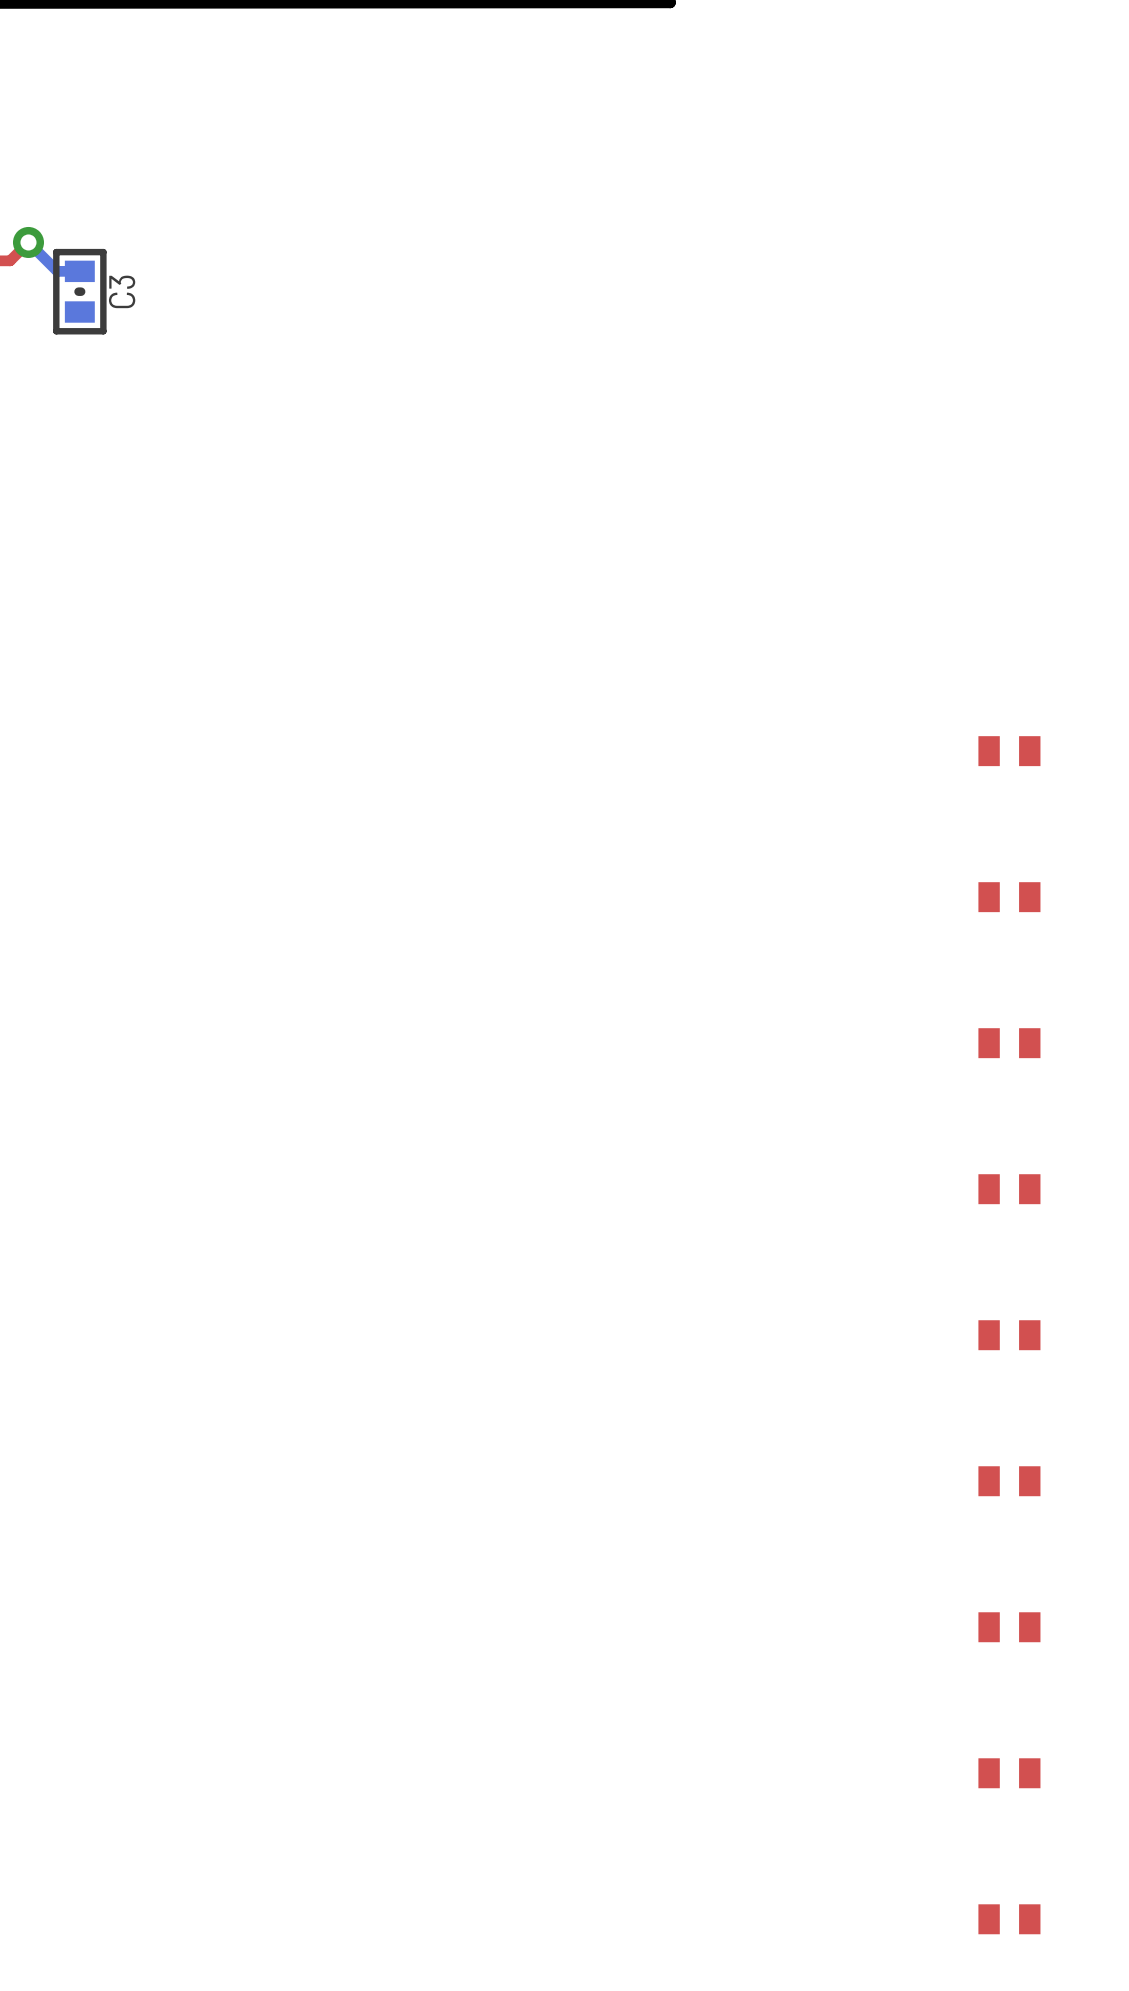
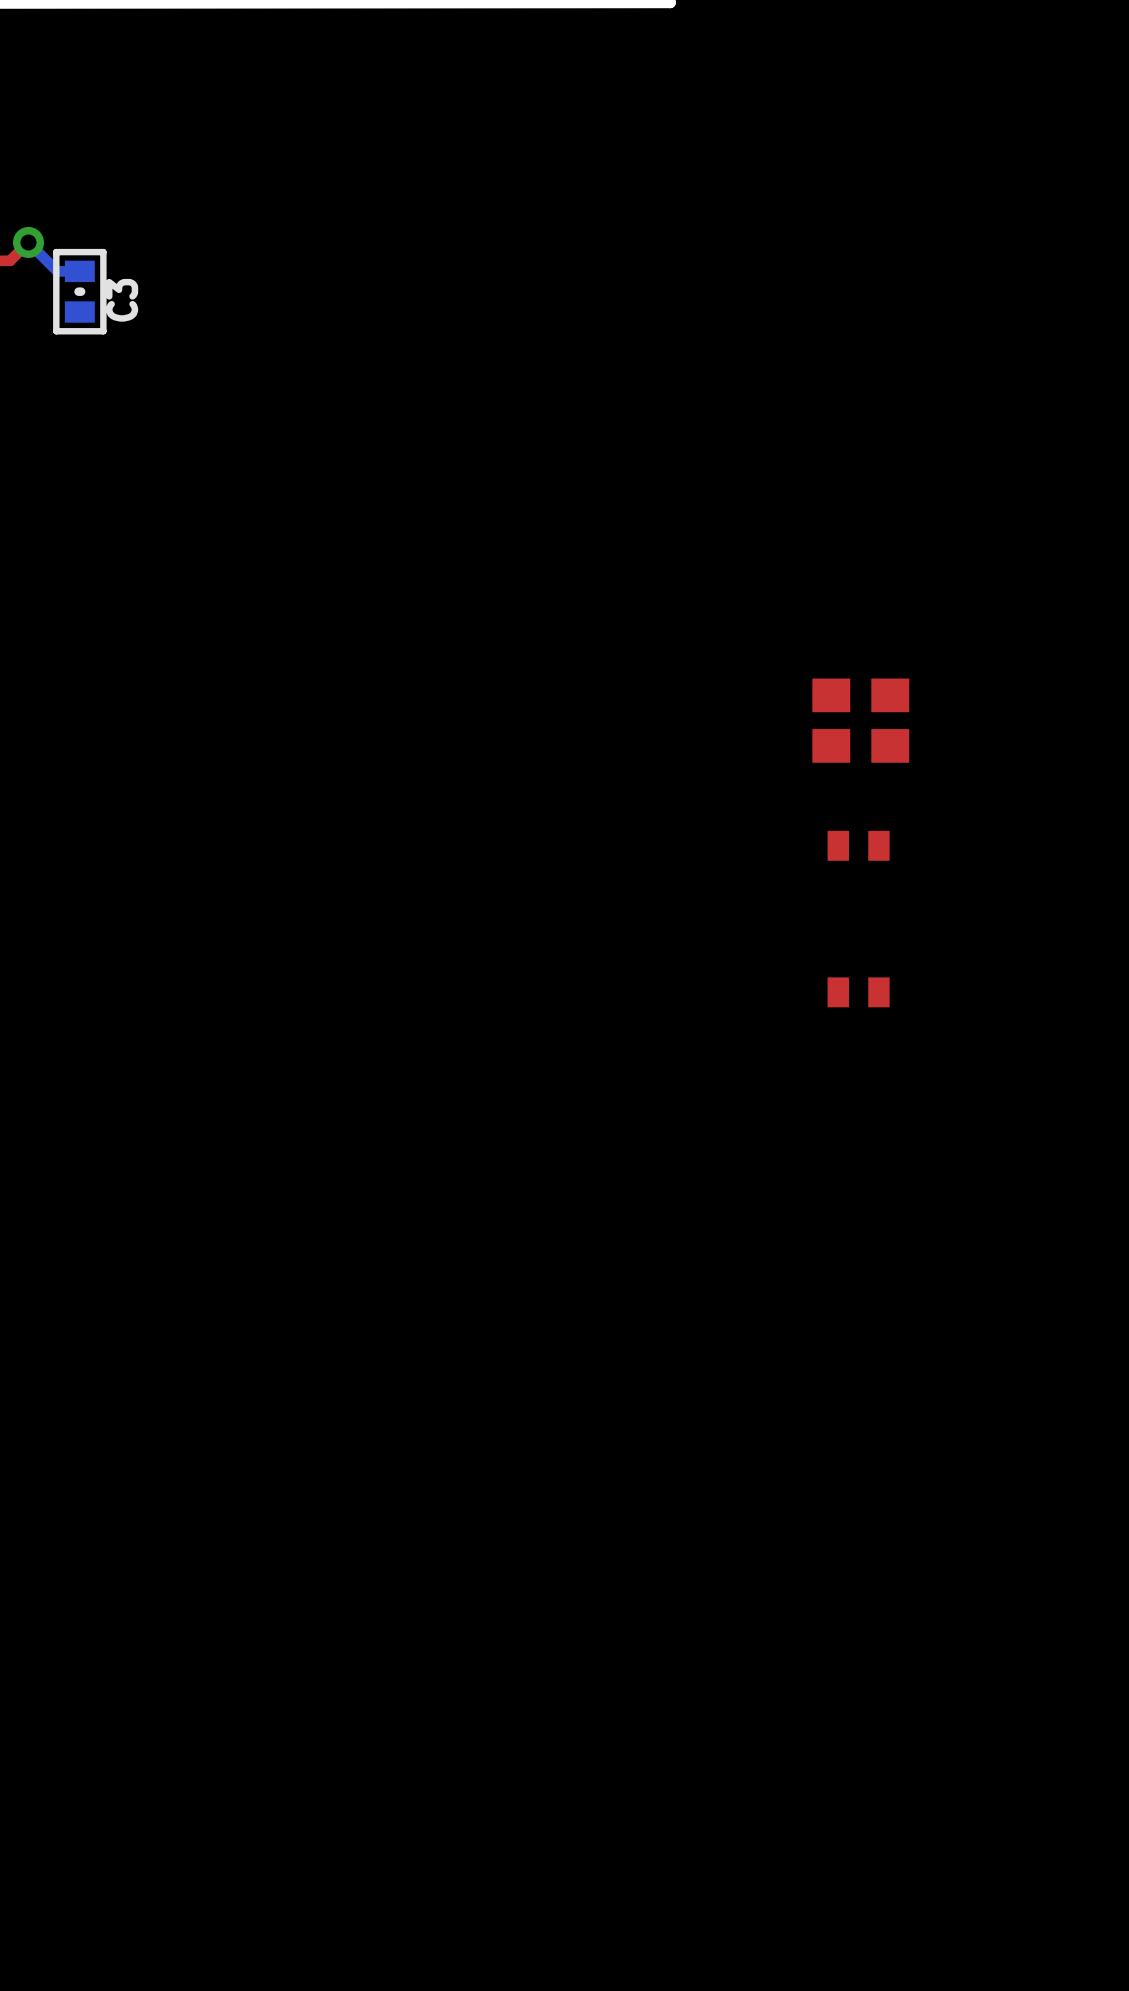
part: none -> (860, 720)
part: (1009, 751) -> none
part: none -> (858, 845)
part: (1009, 897) -> none
part: none -> (858, 992)
part: (1009, 1043) -> none
part: (1009, 1189) -> none
part: (1009, 1335) -> none
part: (1009, 1481) -> none
part: (1009, 1627) -> none
part: (1009, 1773) -> none
part: (1009, 1919) -> none

